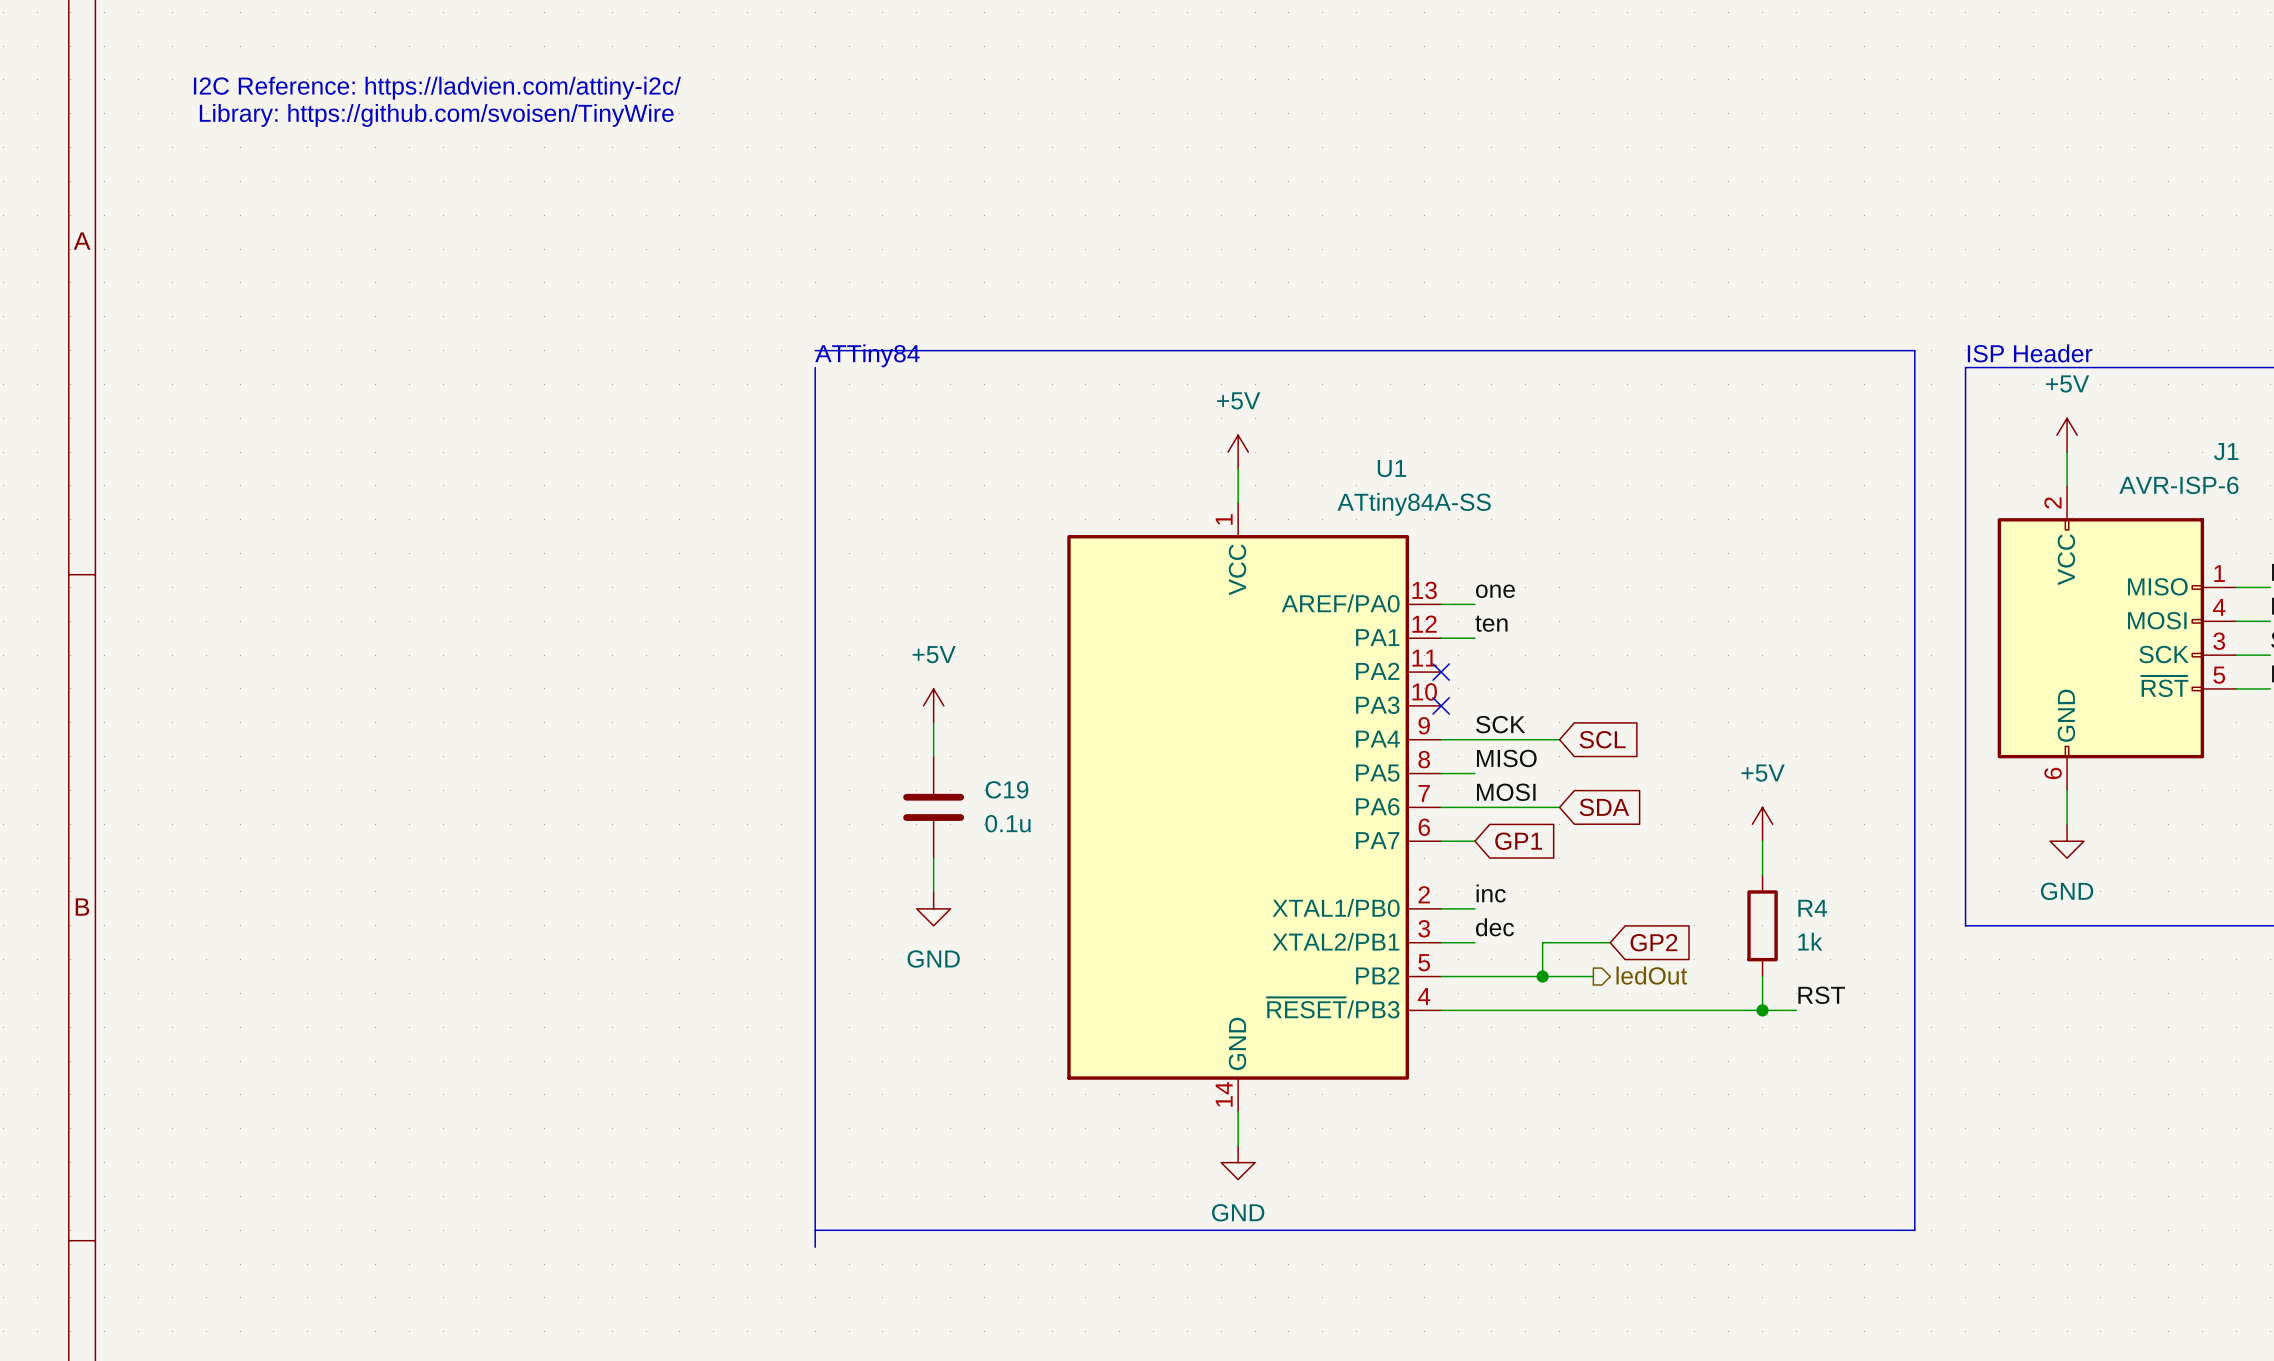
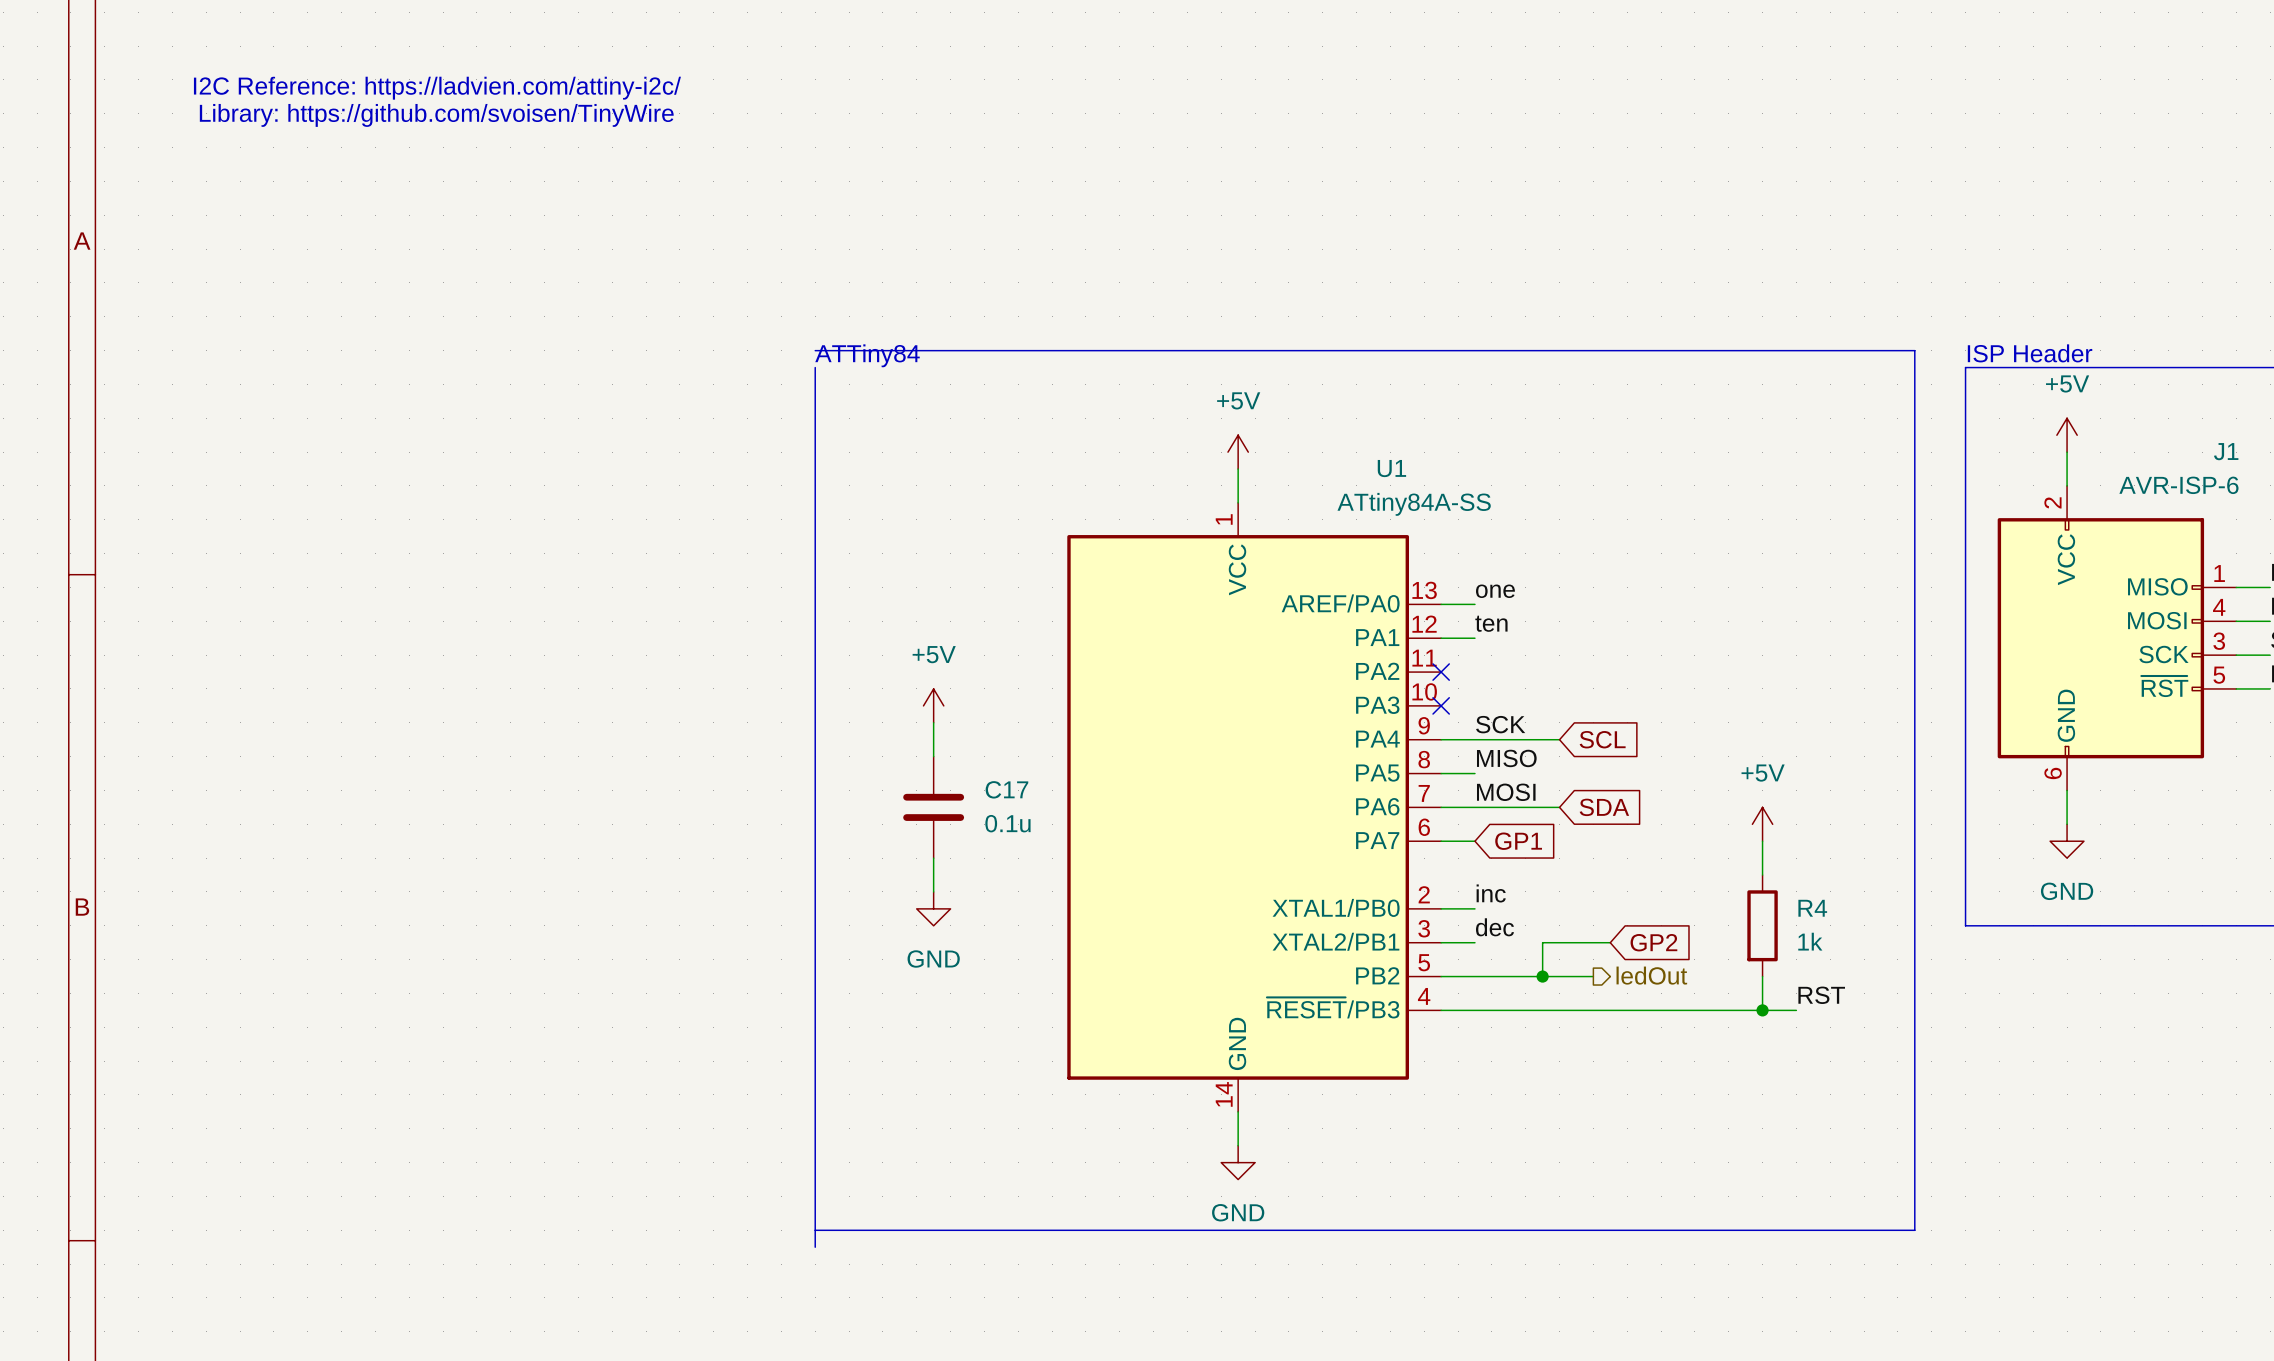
C19 name: C19 (1006, 789) -> C17 (1006, 789)

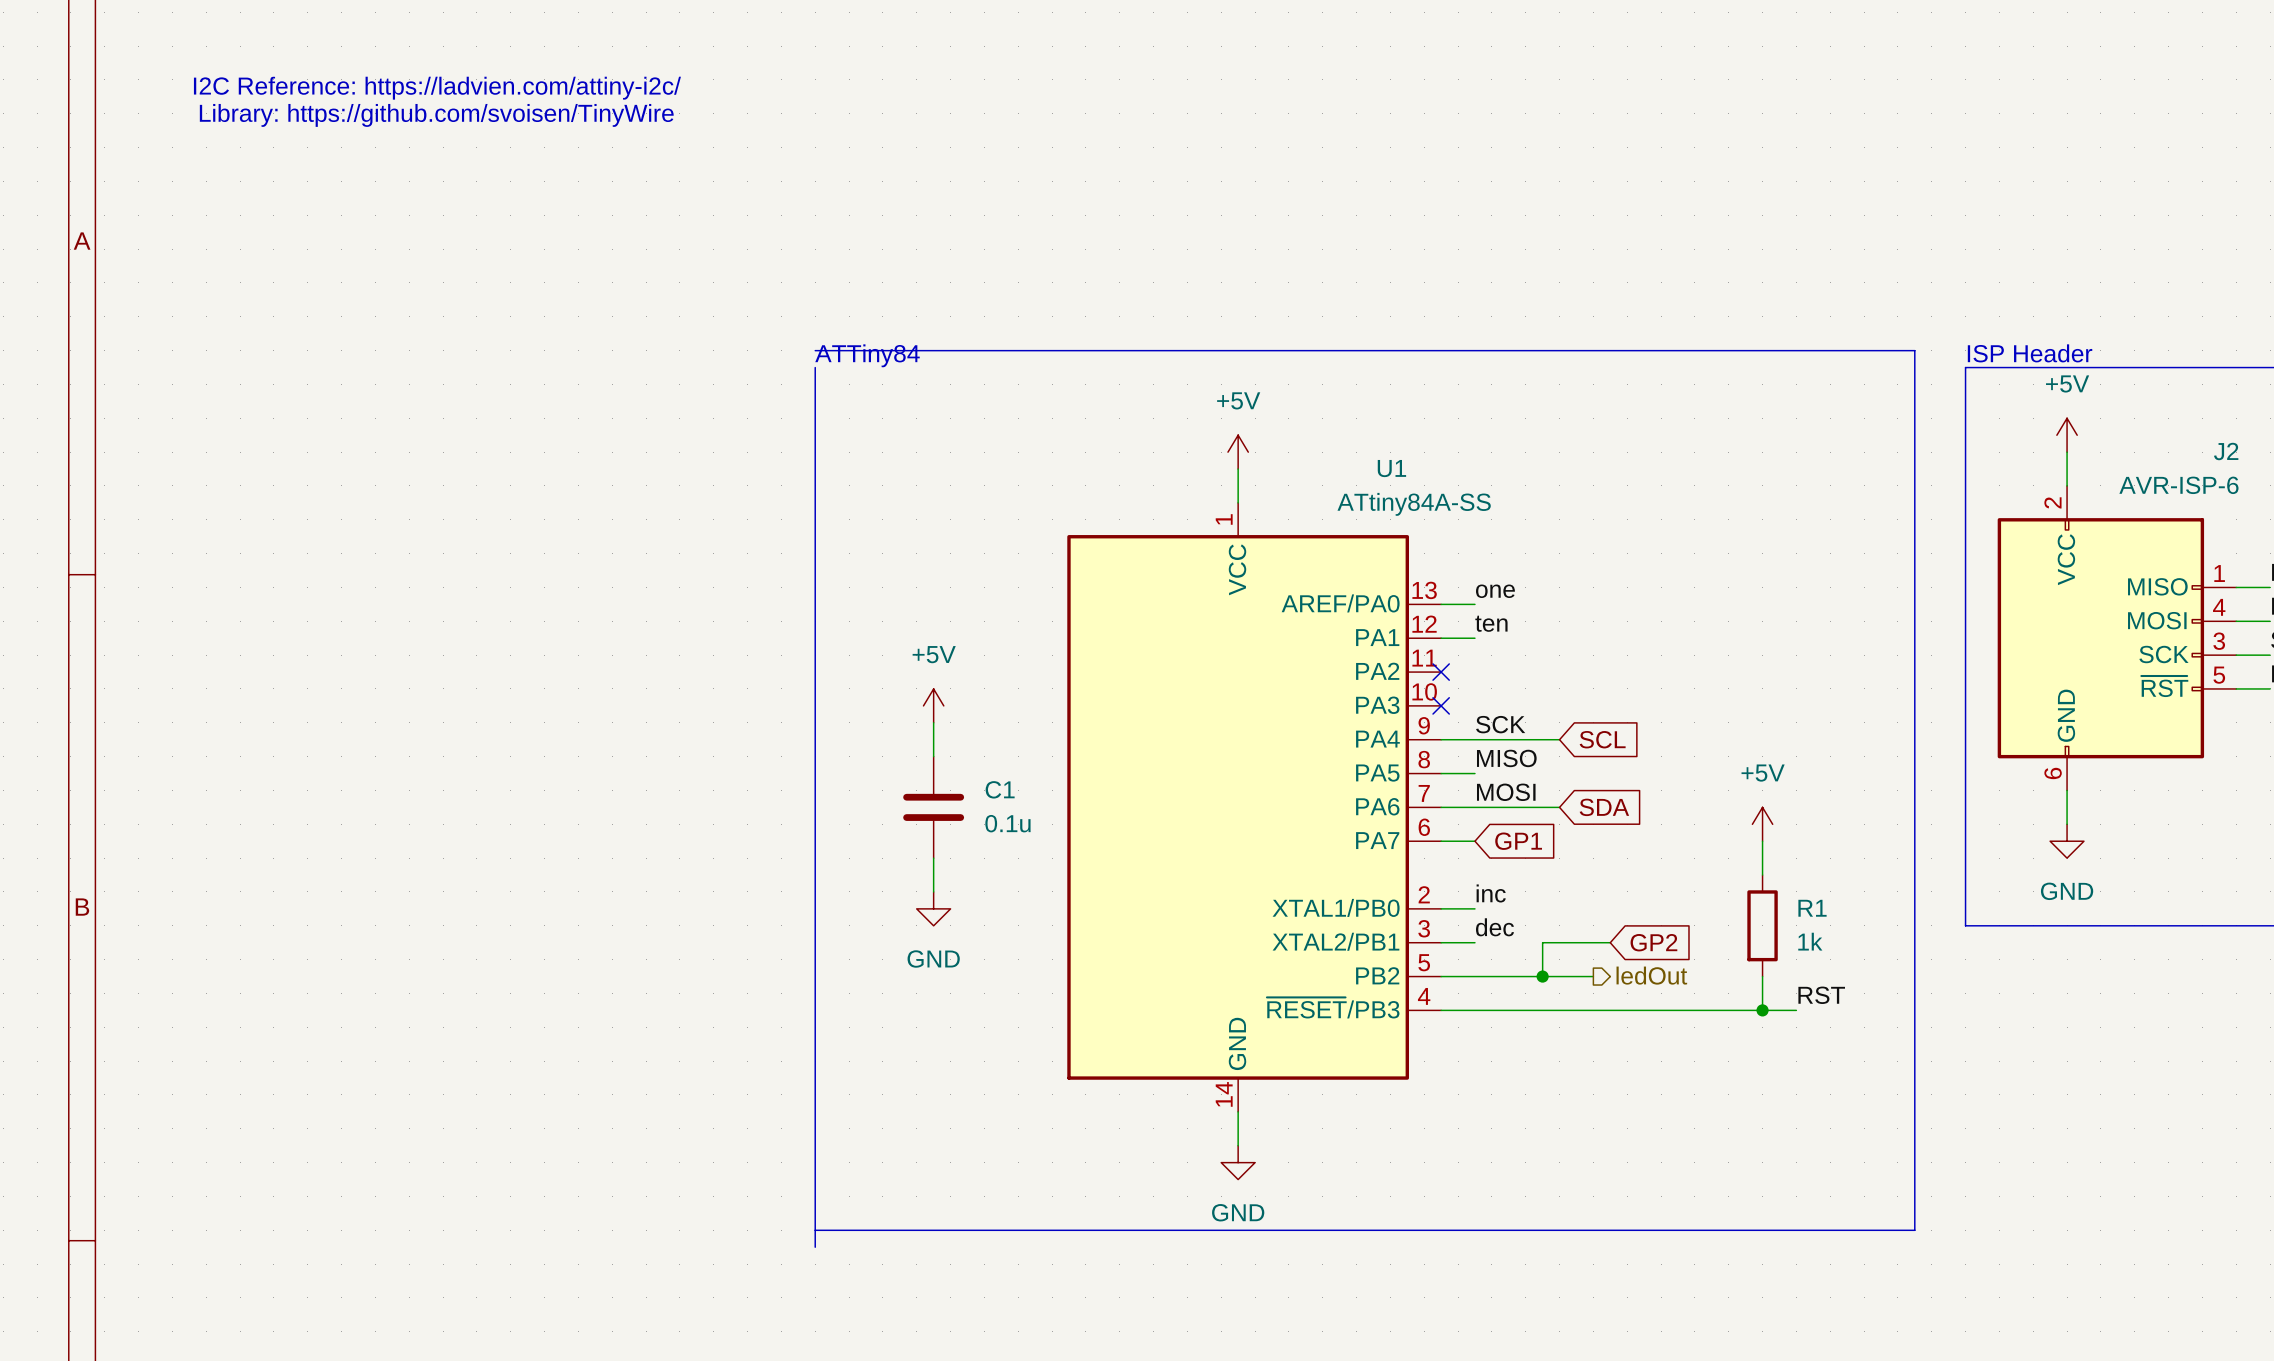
J1 name: J1 (2226, 451) -> J2 (2226, 451)
C17 name: C17 (1006, 789) -> C1 (1000, 789)
R4 name: R4 (1812, 908) -> R1 (1812, 908)

